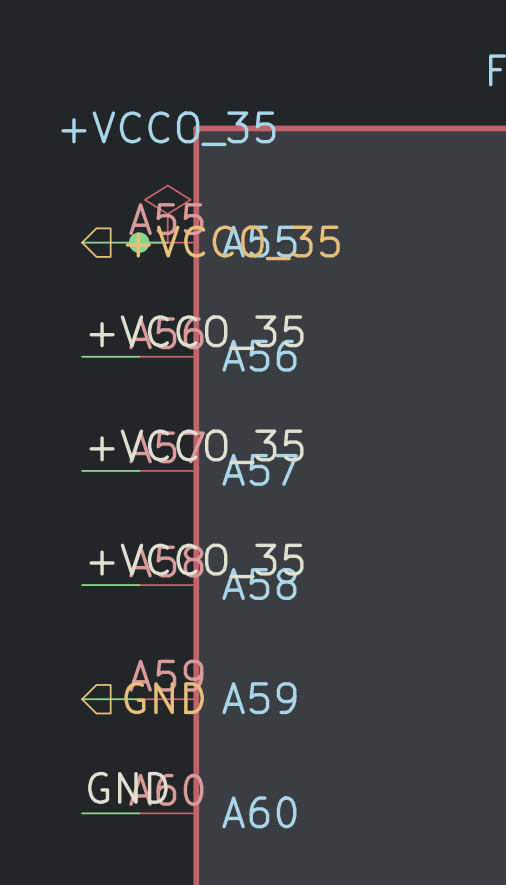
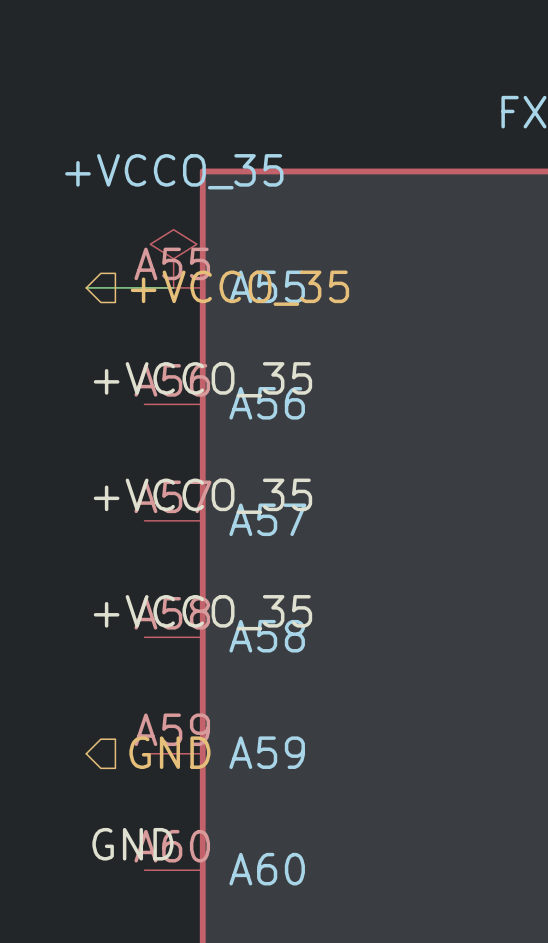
junction: (139, 242) -> none
wire: (82, 356) (139, 356) -> none
wire: (82, 470) (139, 470) -> none
wire: (82, 585) (139, 585) -> none
wire: (82, 699) (139, 699) -> none
wire: (82, 813) (139, 813) -> none

